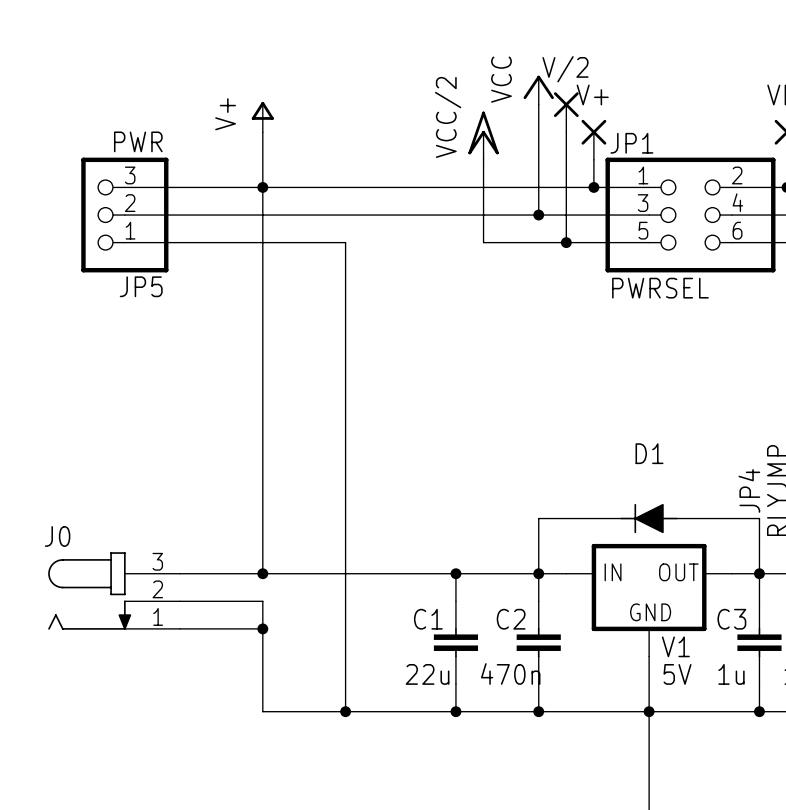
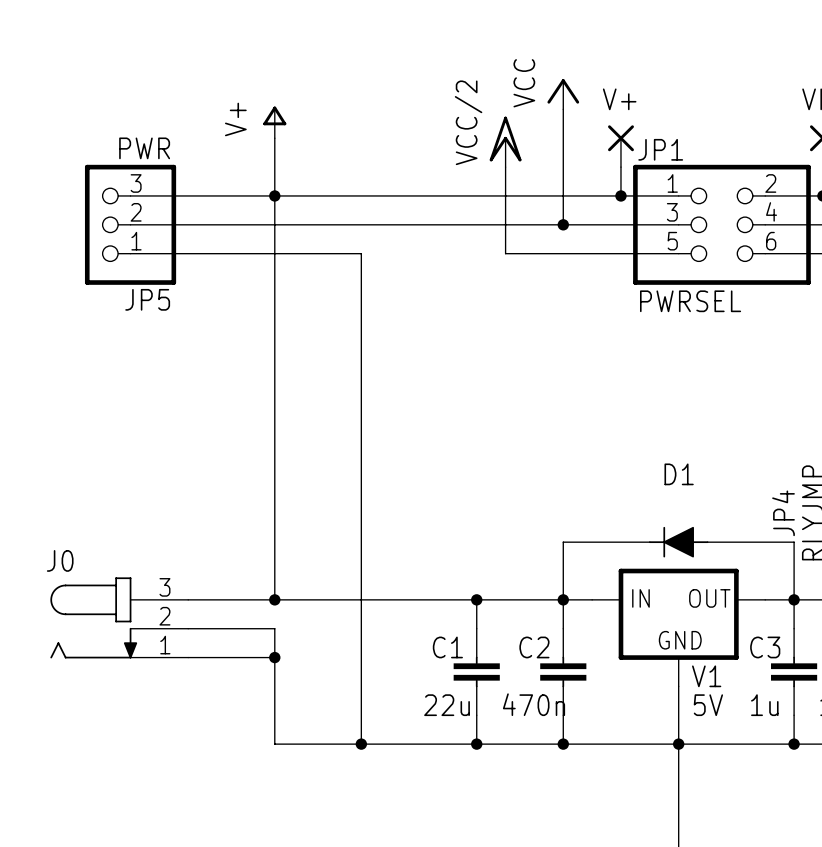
V/2: (566, 112) -> none
wire: (566, 132) (566, 242) -> none
junction: (566, 242) -> none

